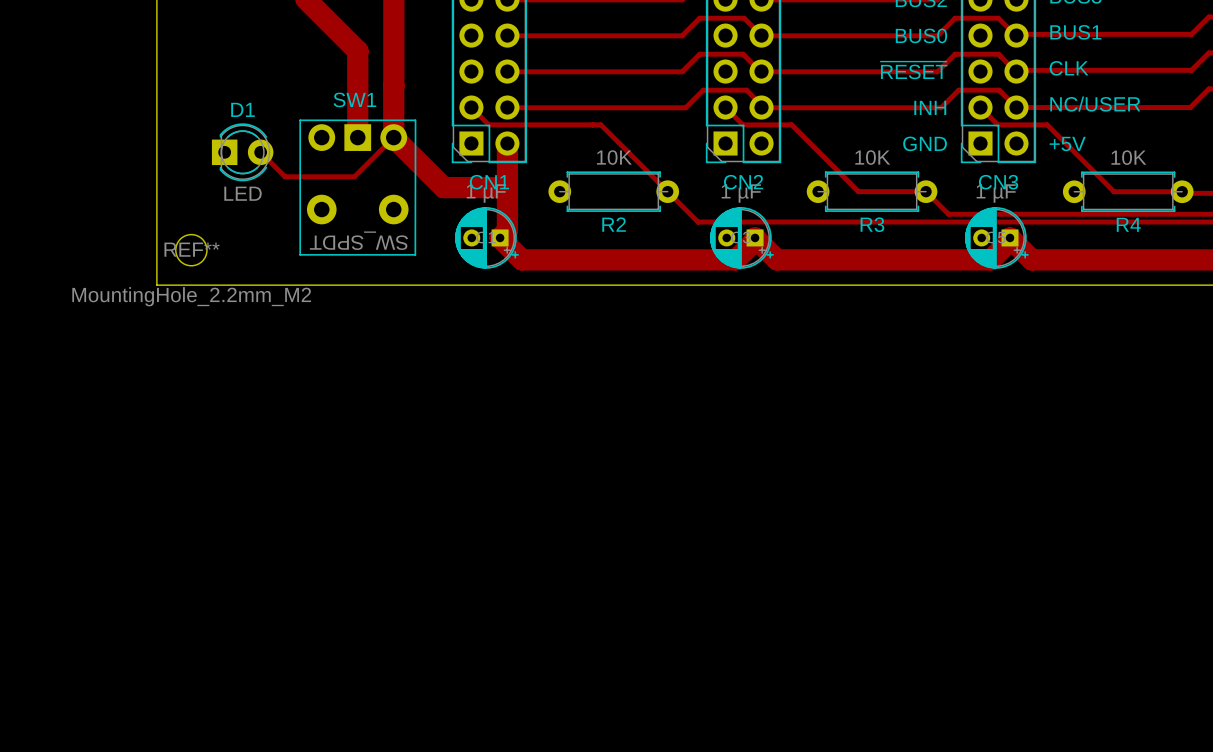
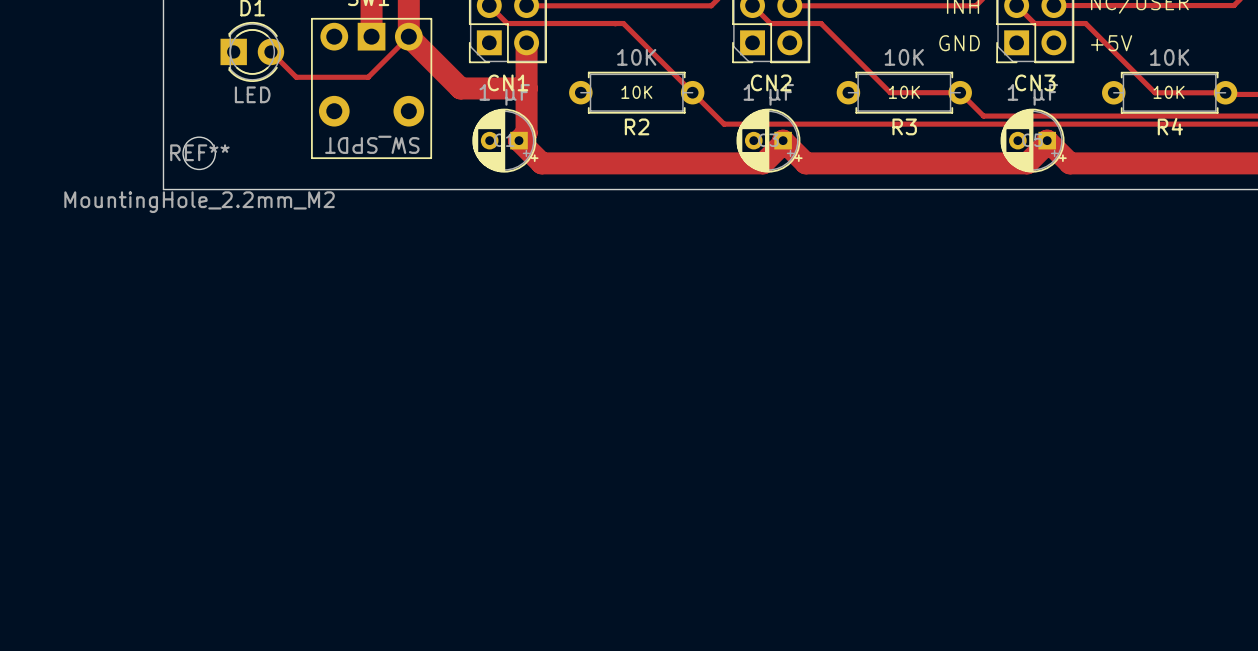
text: none -> 10K (636, 92)
text: none -> 10K (904, 92)
text: none -> 10K (1169, 92)

